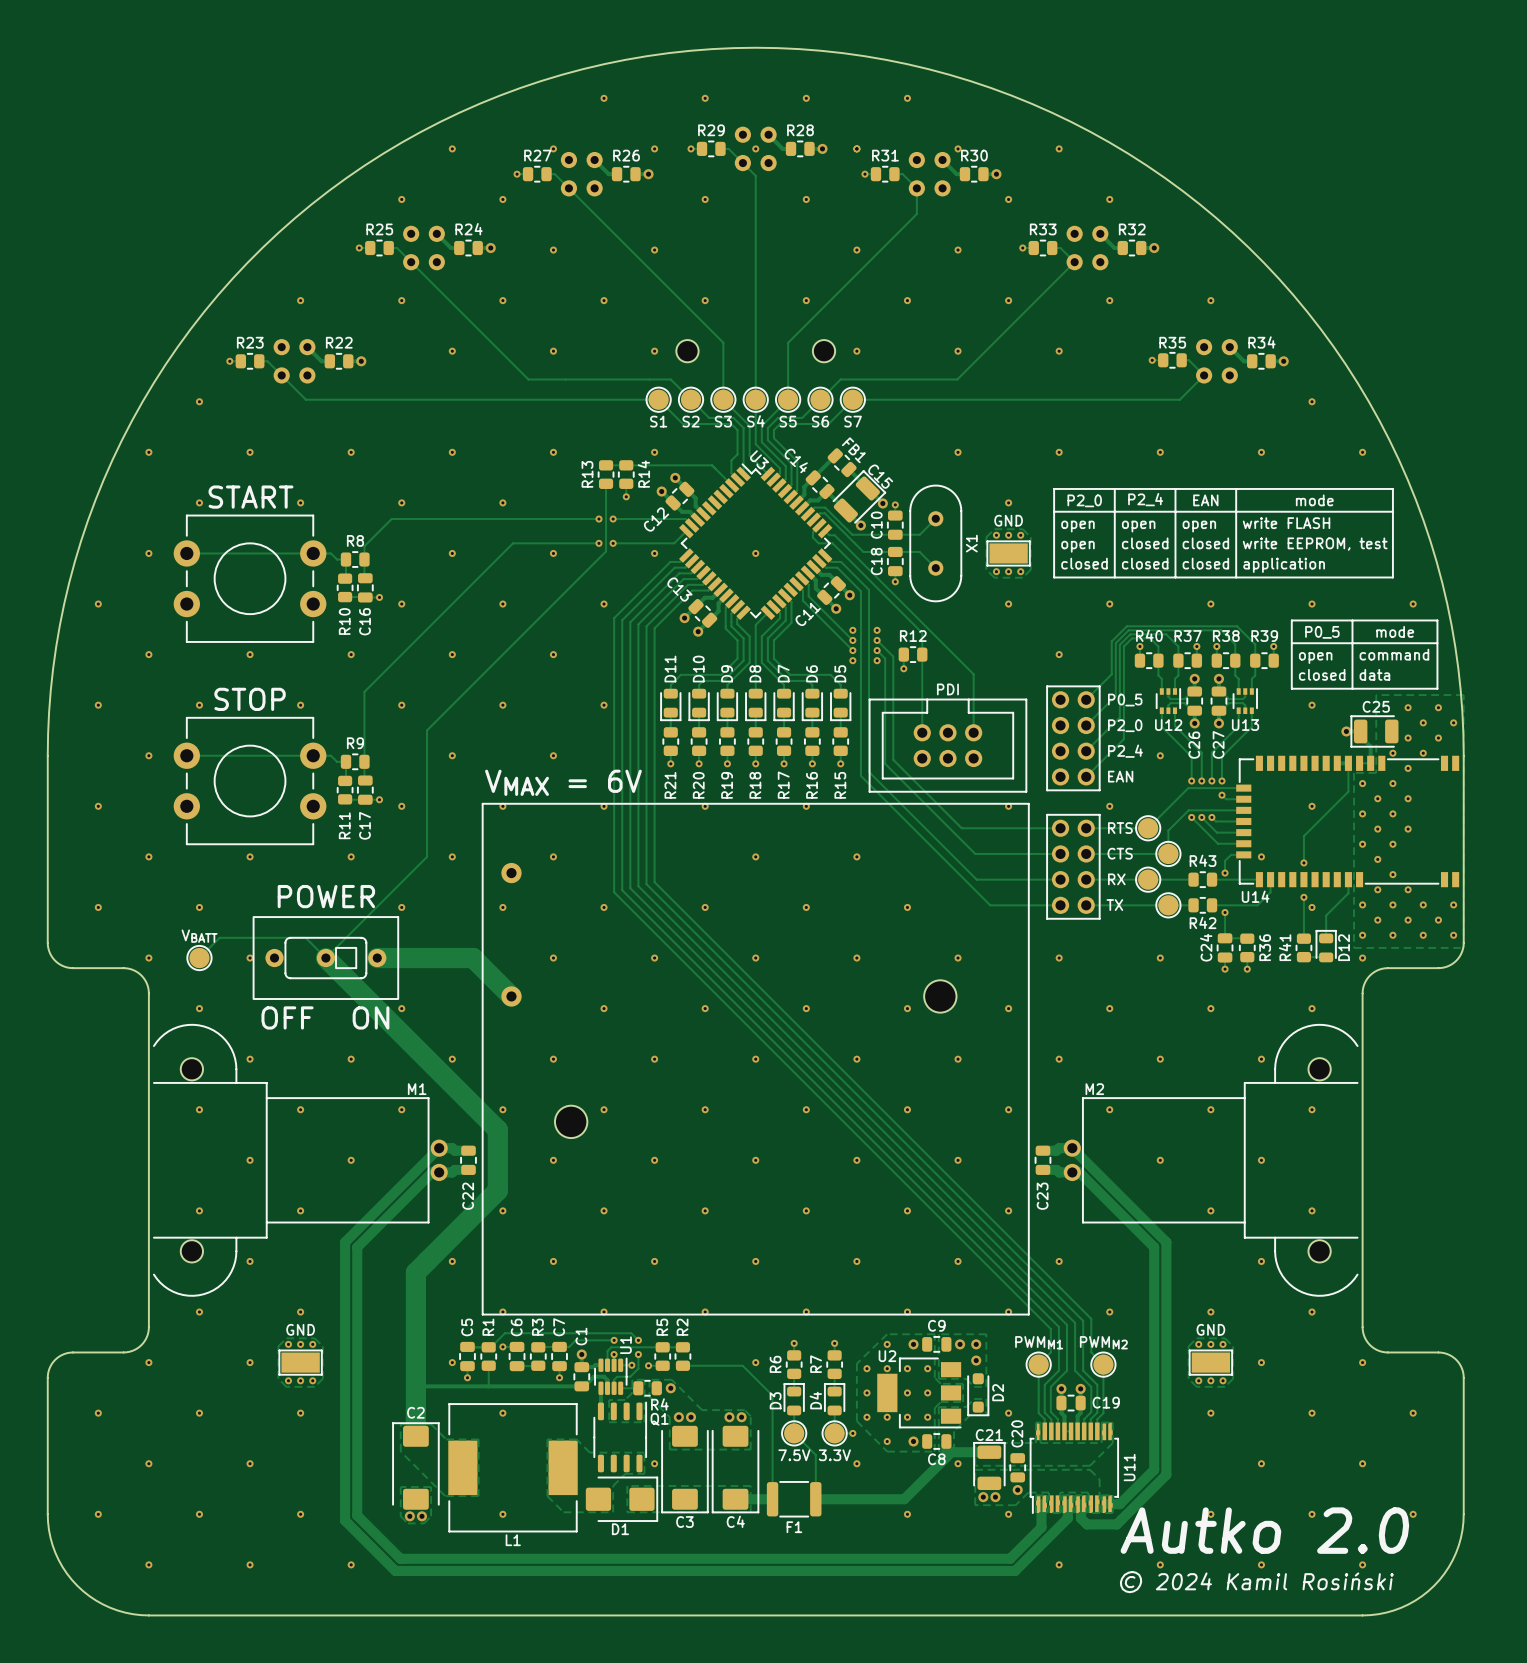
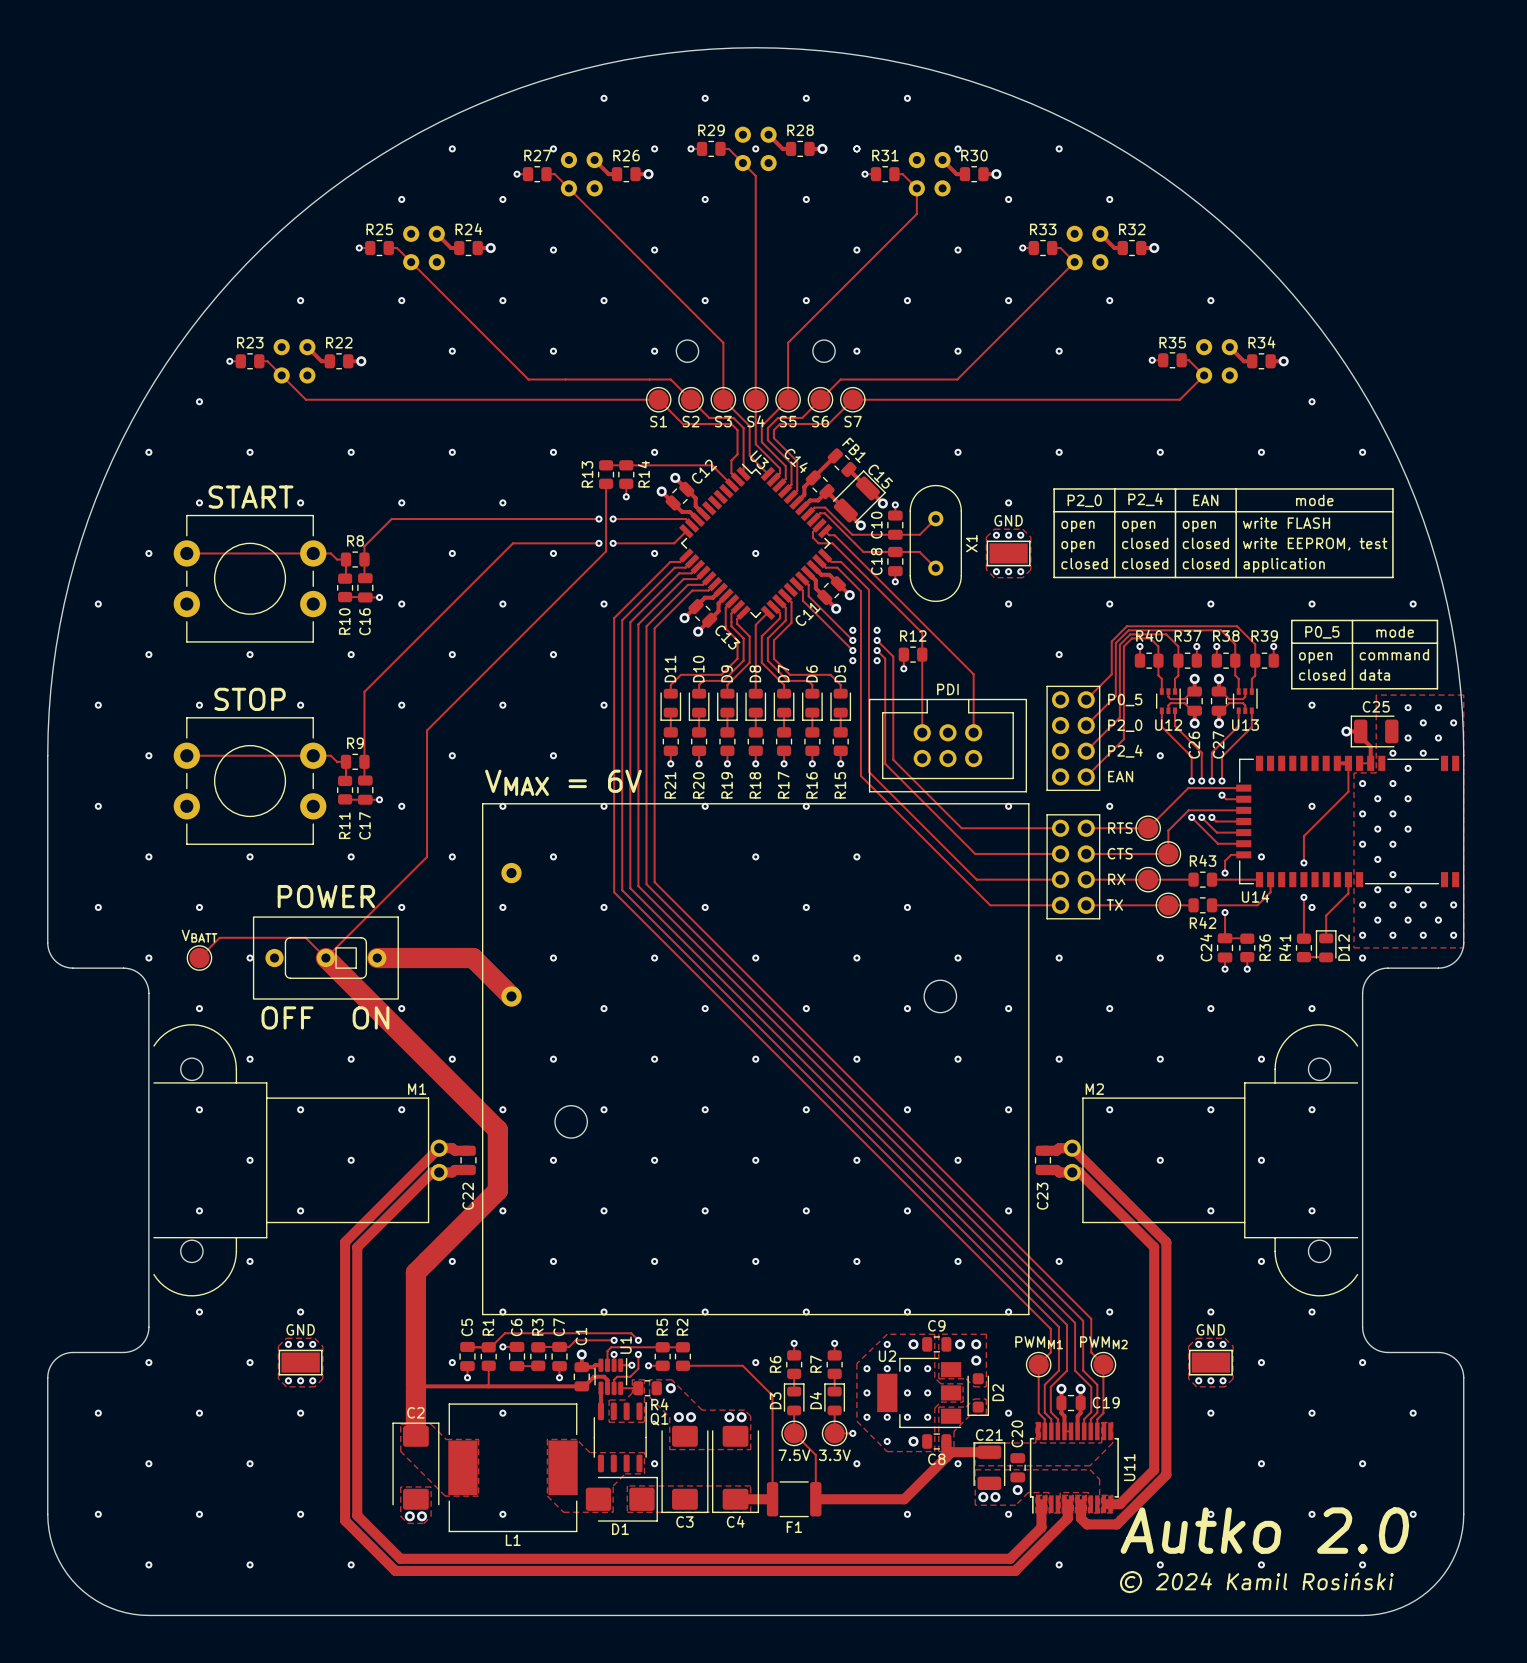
C12 name position: C12 (656, 519) -> C12 (704, 471)
C13 name position: C13 (679, 589) -> C13 (727, 637)

